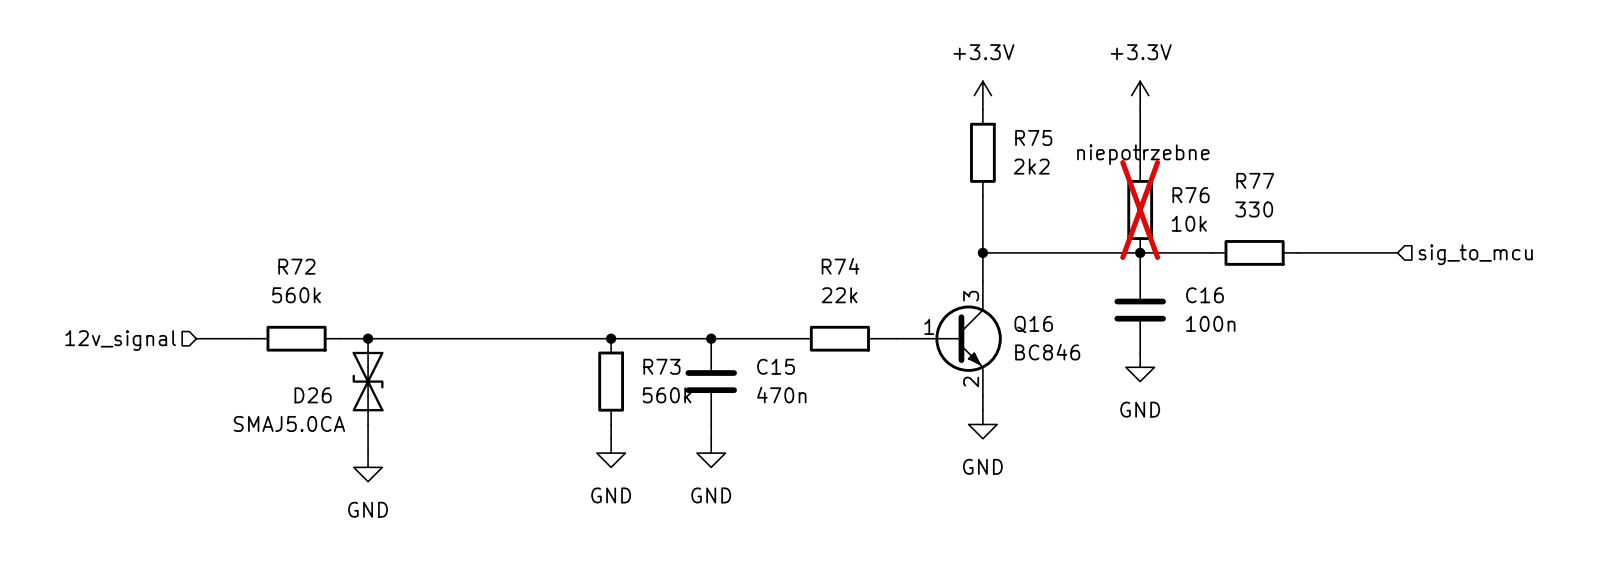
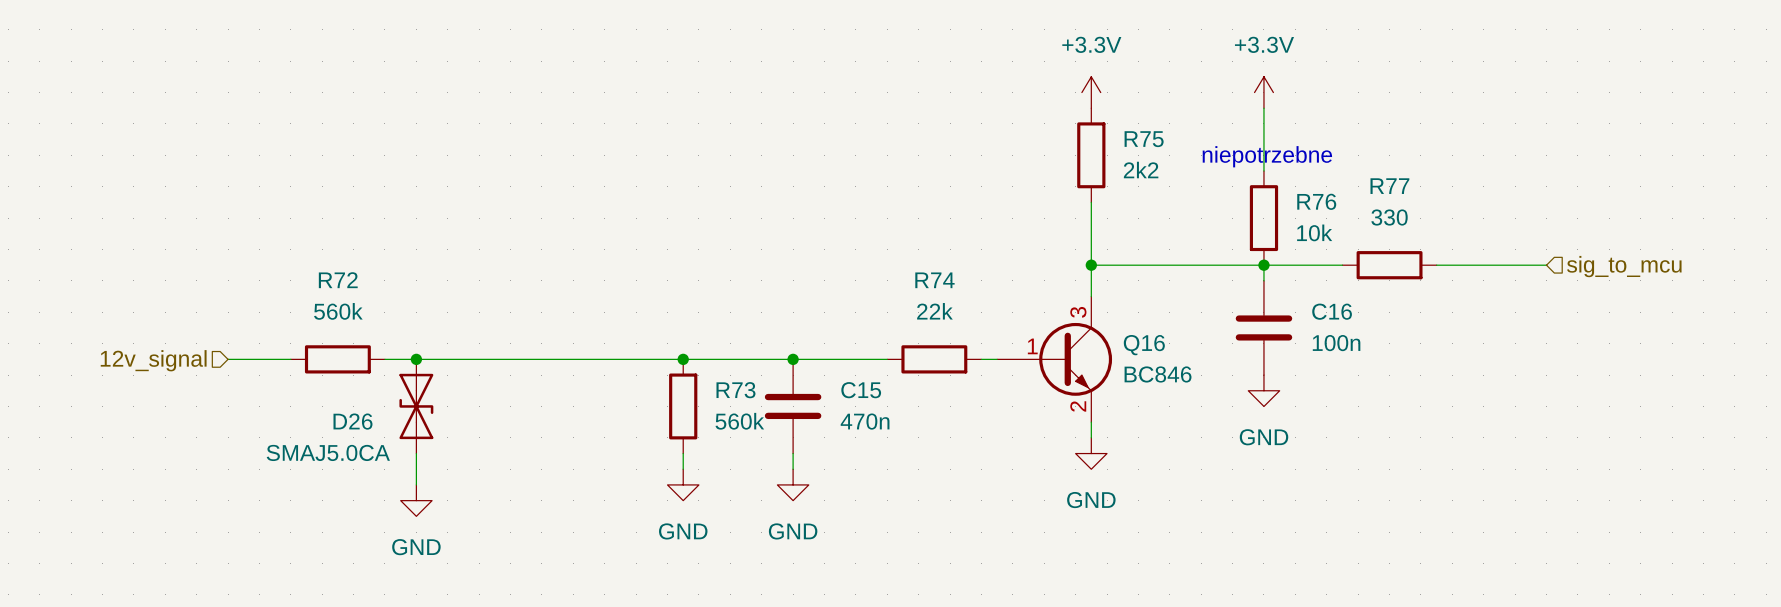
R76 do-not-place cross: (1140, 210) -> none

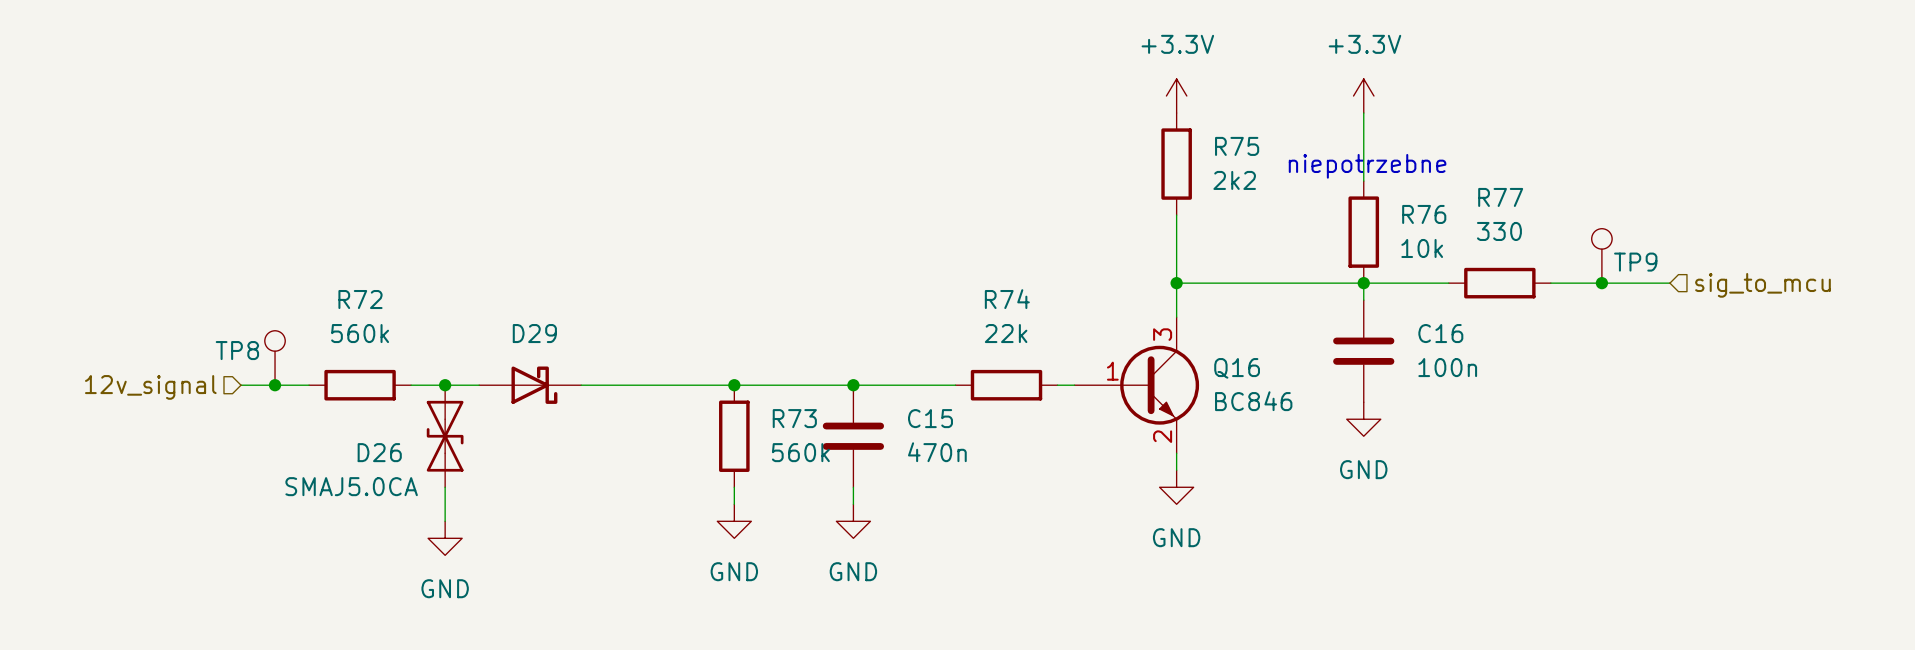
TP9: none -> (1601, 255)
junction: none -> (1601, 283)
TP8: none -> (275, 357)
junction: none -> (275, 385)
D29: none -> (530, 385)

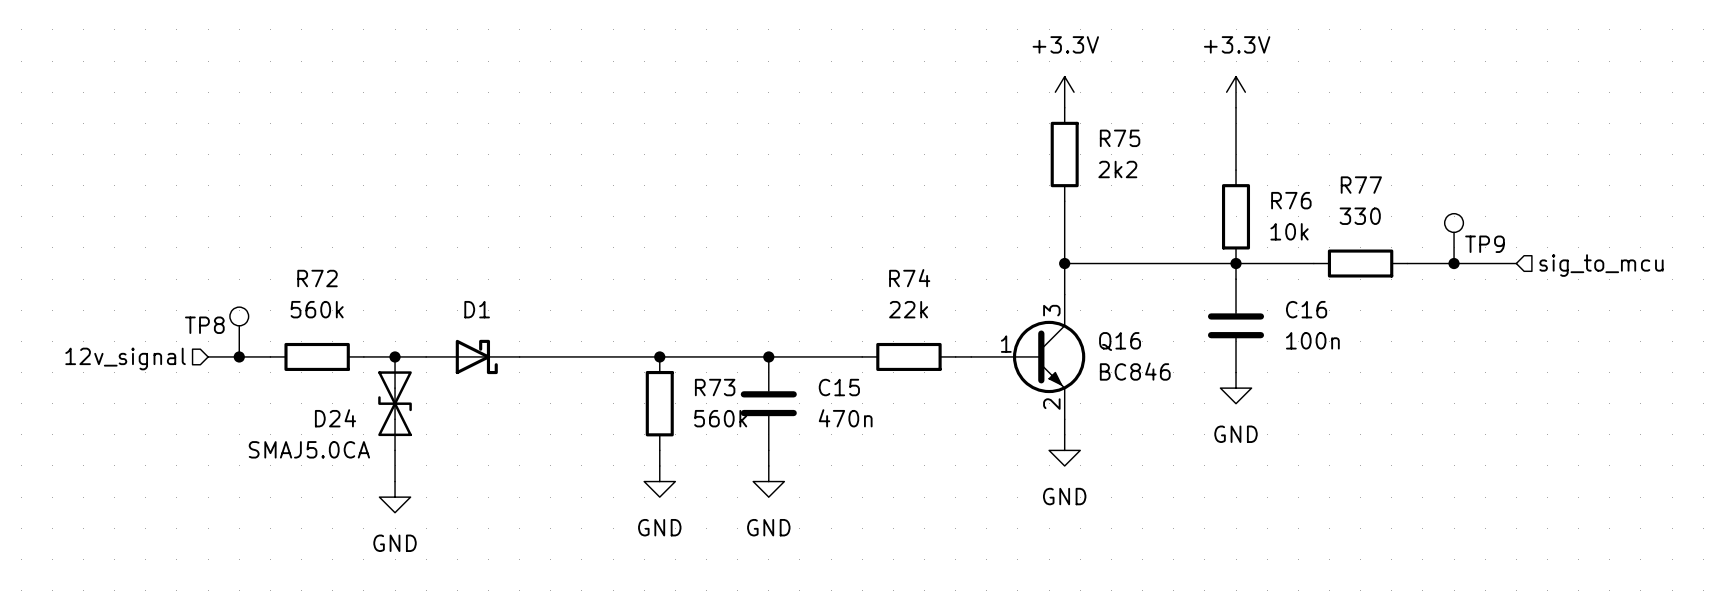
text: niepotrzebne (1367, 166) -> none
D29 name: D29 (534, 333) -> D1 (477, 309)
D26 name: D26 (379, 452) -> D24 (335, 418)

